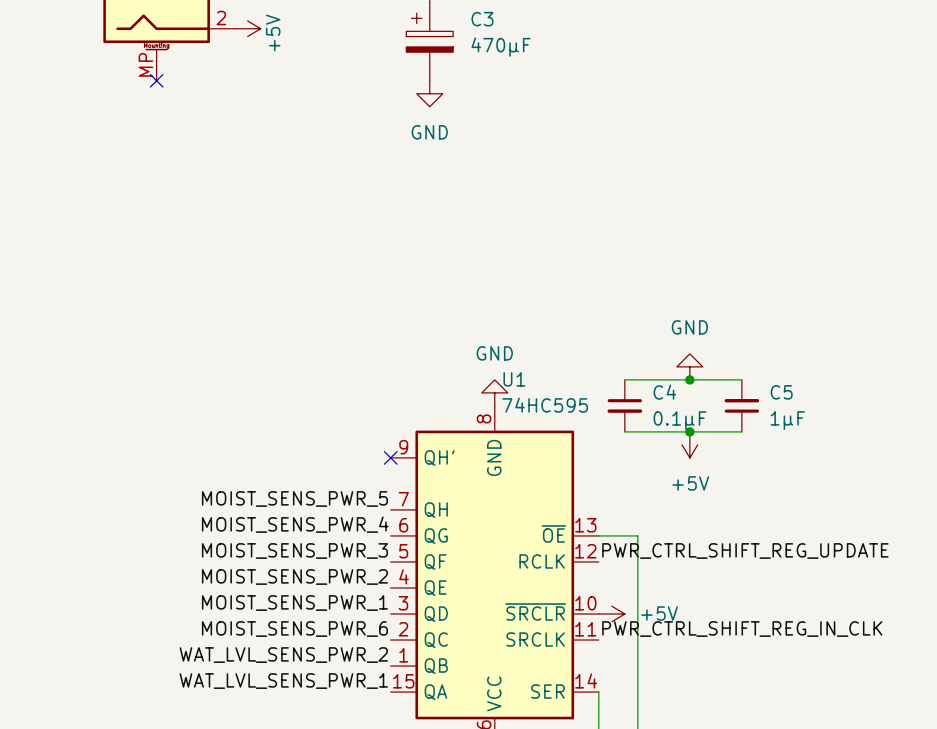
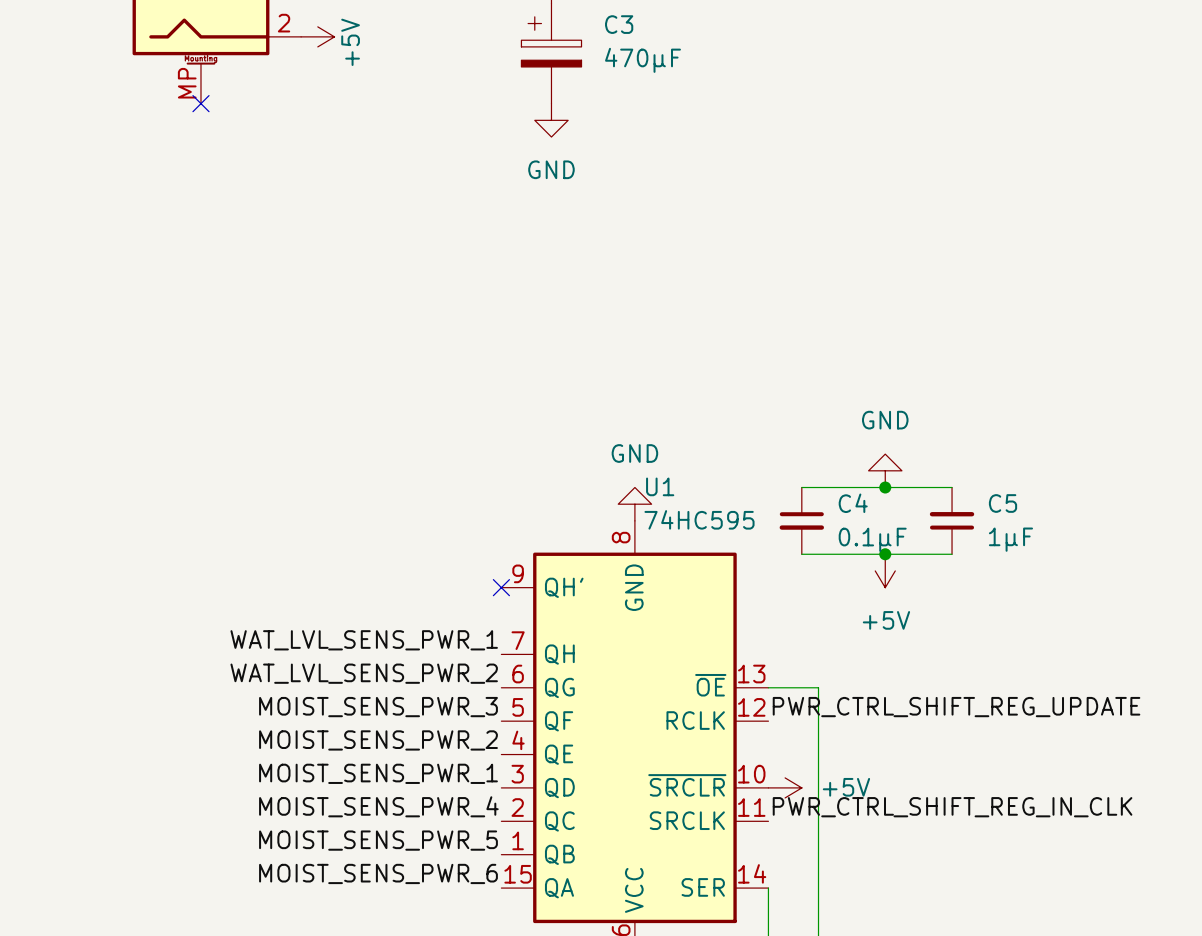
label: MOIST_SENS_PWR_5 (294, 498) -> WAT_LVL_SENS_PWR_1 (364, 640)
label: MOIST_SENS_PWR_4 (295, 524) -> WAT_LVL_SENS_PWR_2 (364, 673)
label: MOIST_SENS_PWR_6 (294, 629) -> MOIST_SENS_PWR_4 (378, 806)
label: WAT_LVL_SENS_PWR_2 (283, 655) -> MOIST_SENS_PWR_5 (378, 840)
label: WAT_LVL_SENS_PWR_1 (283, 681) -> MOIST_SENS_PWR_6 (378, 873)

